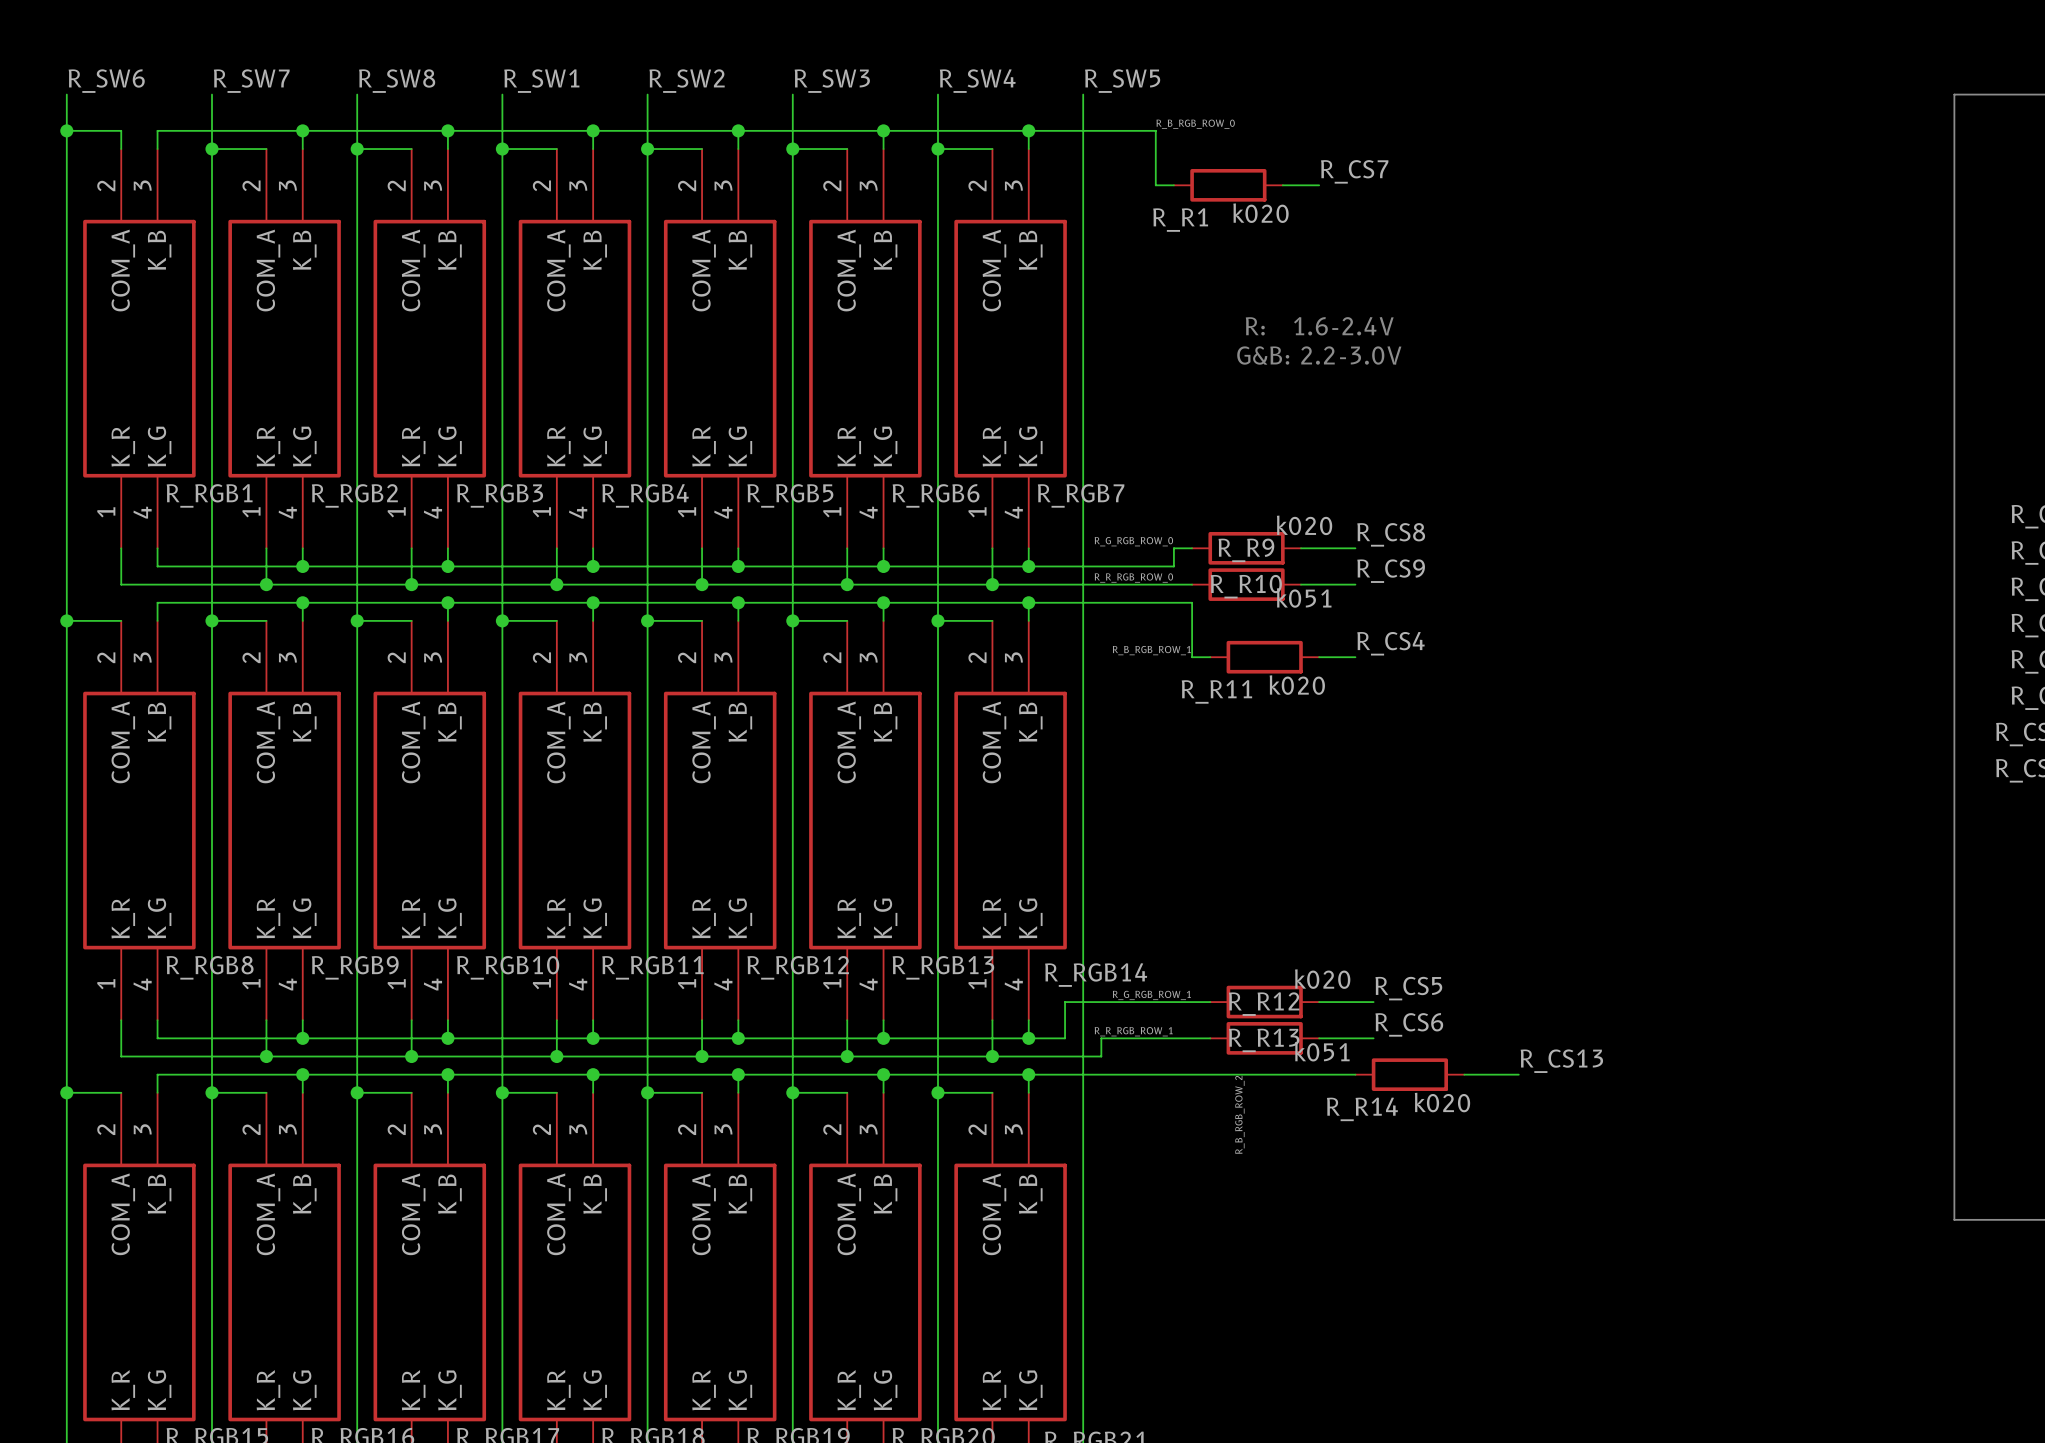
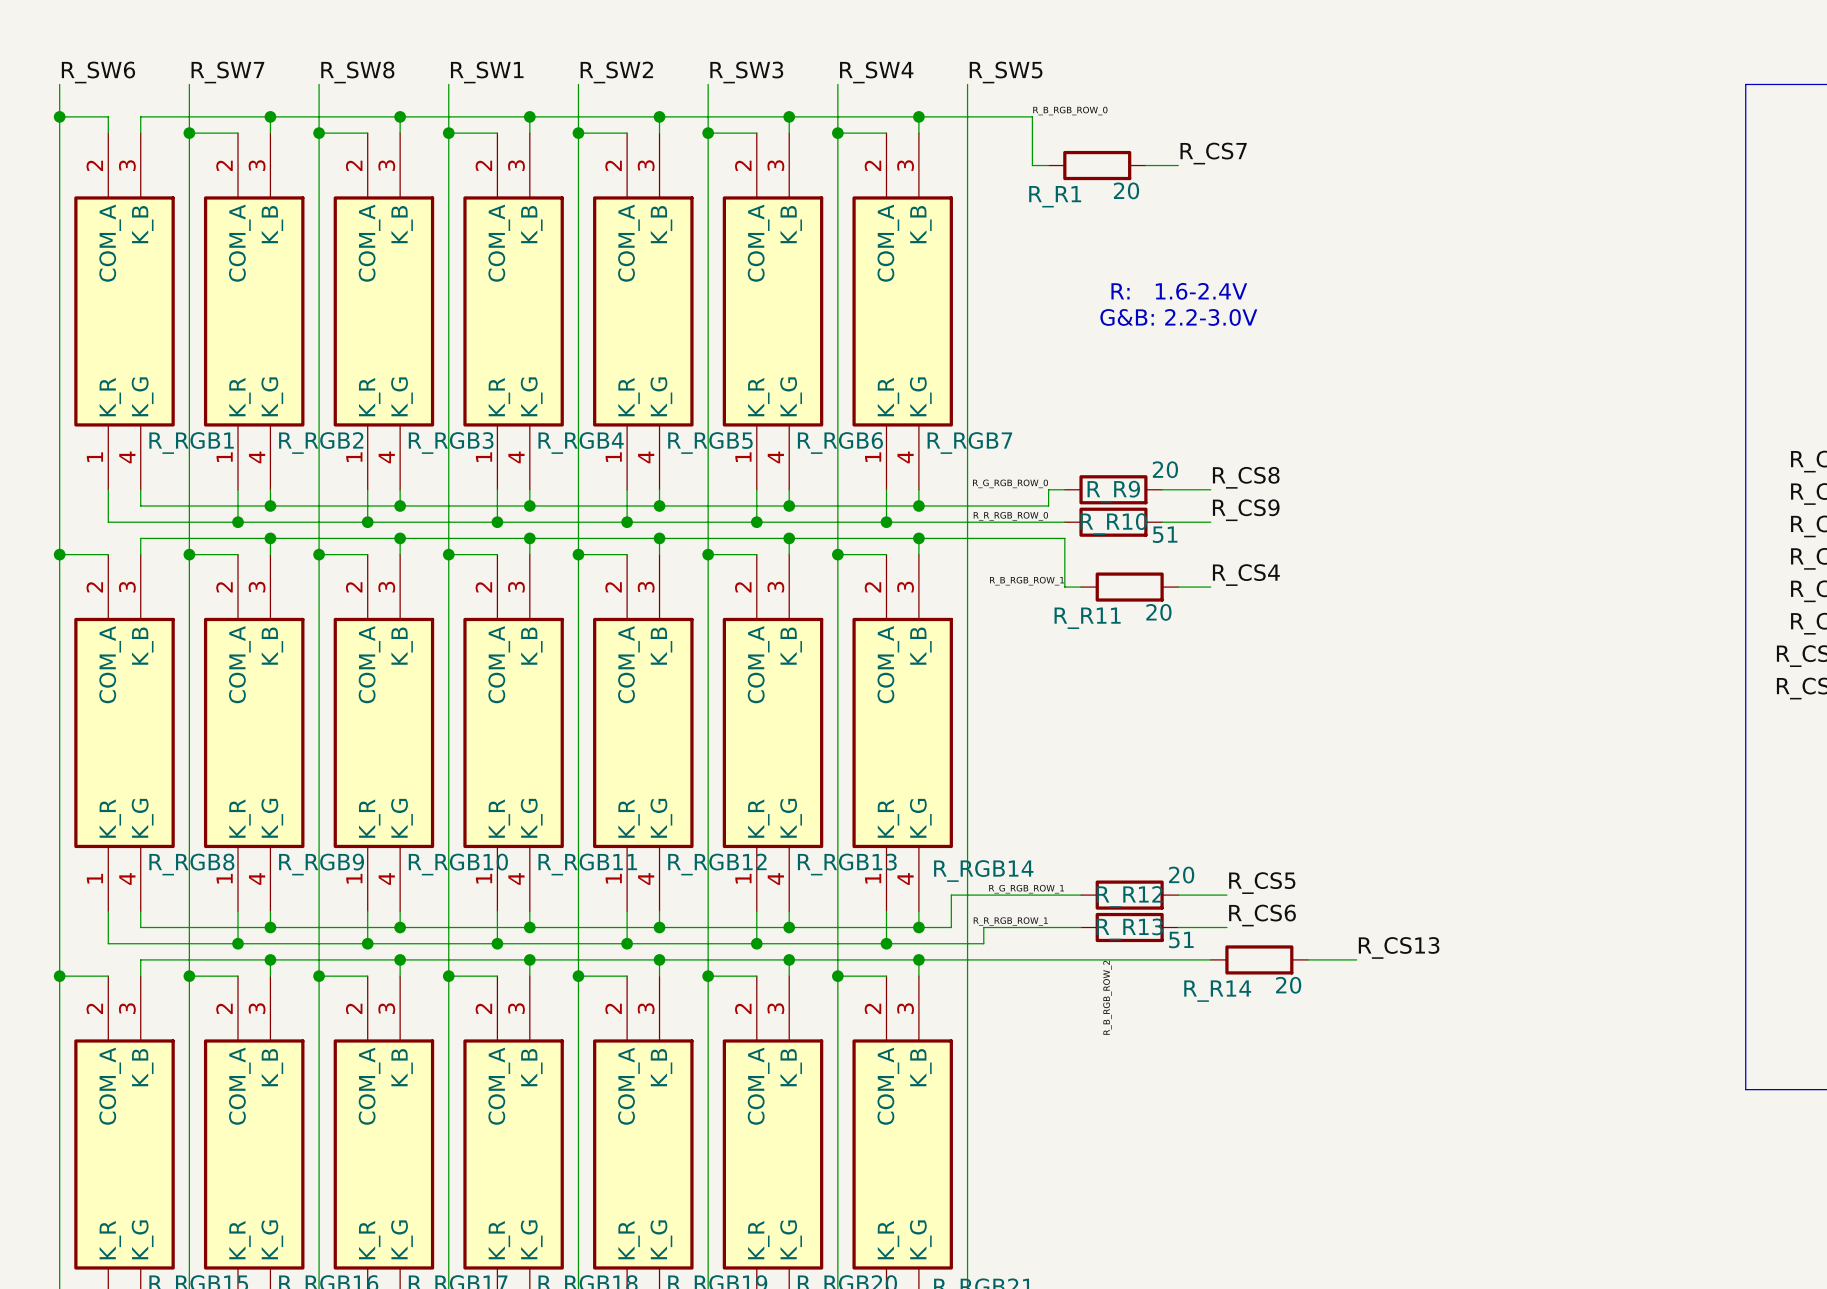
R_R1 value: k020 (1261, 213) -> 20 (1126, 190)
R_R9 value: k020 (1304, 525) -> 20 (1165, 469)
R_R10 value: k051 (1304, 597) -> 51 (1165, 534)
R_R11 value: k020 (1297, 685) -> 20 (1158, 612)
R_R12 value: k020 (1322, 979) -> 20 (1181, 875)
R_R13 value: k051 (1322, 1051) -> 51 (1181, 940)
R_R14 value: k020 (1442, 1102) -> 20 (1288, 985)

